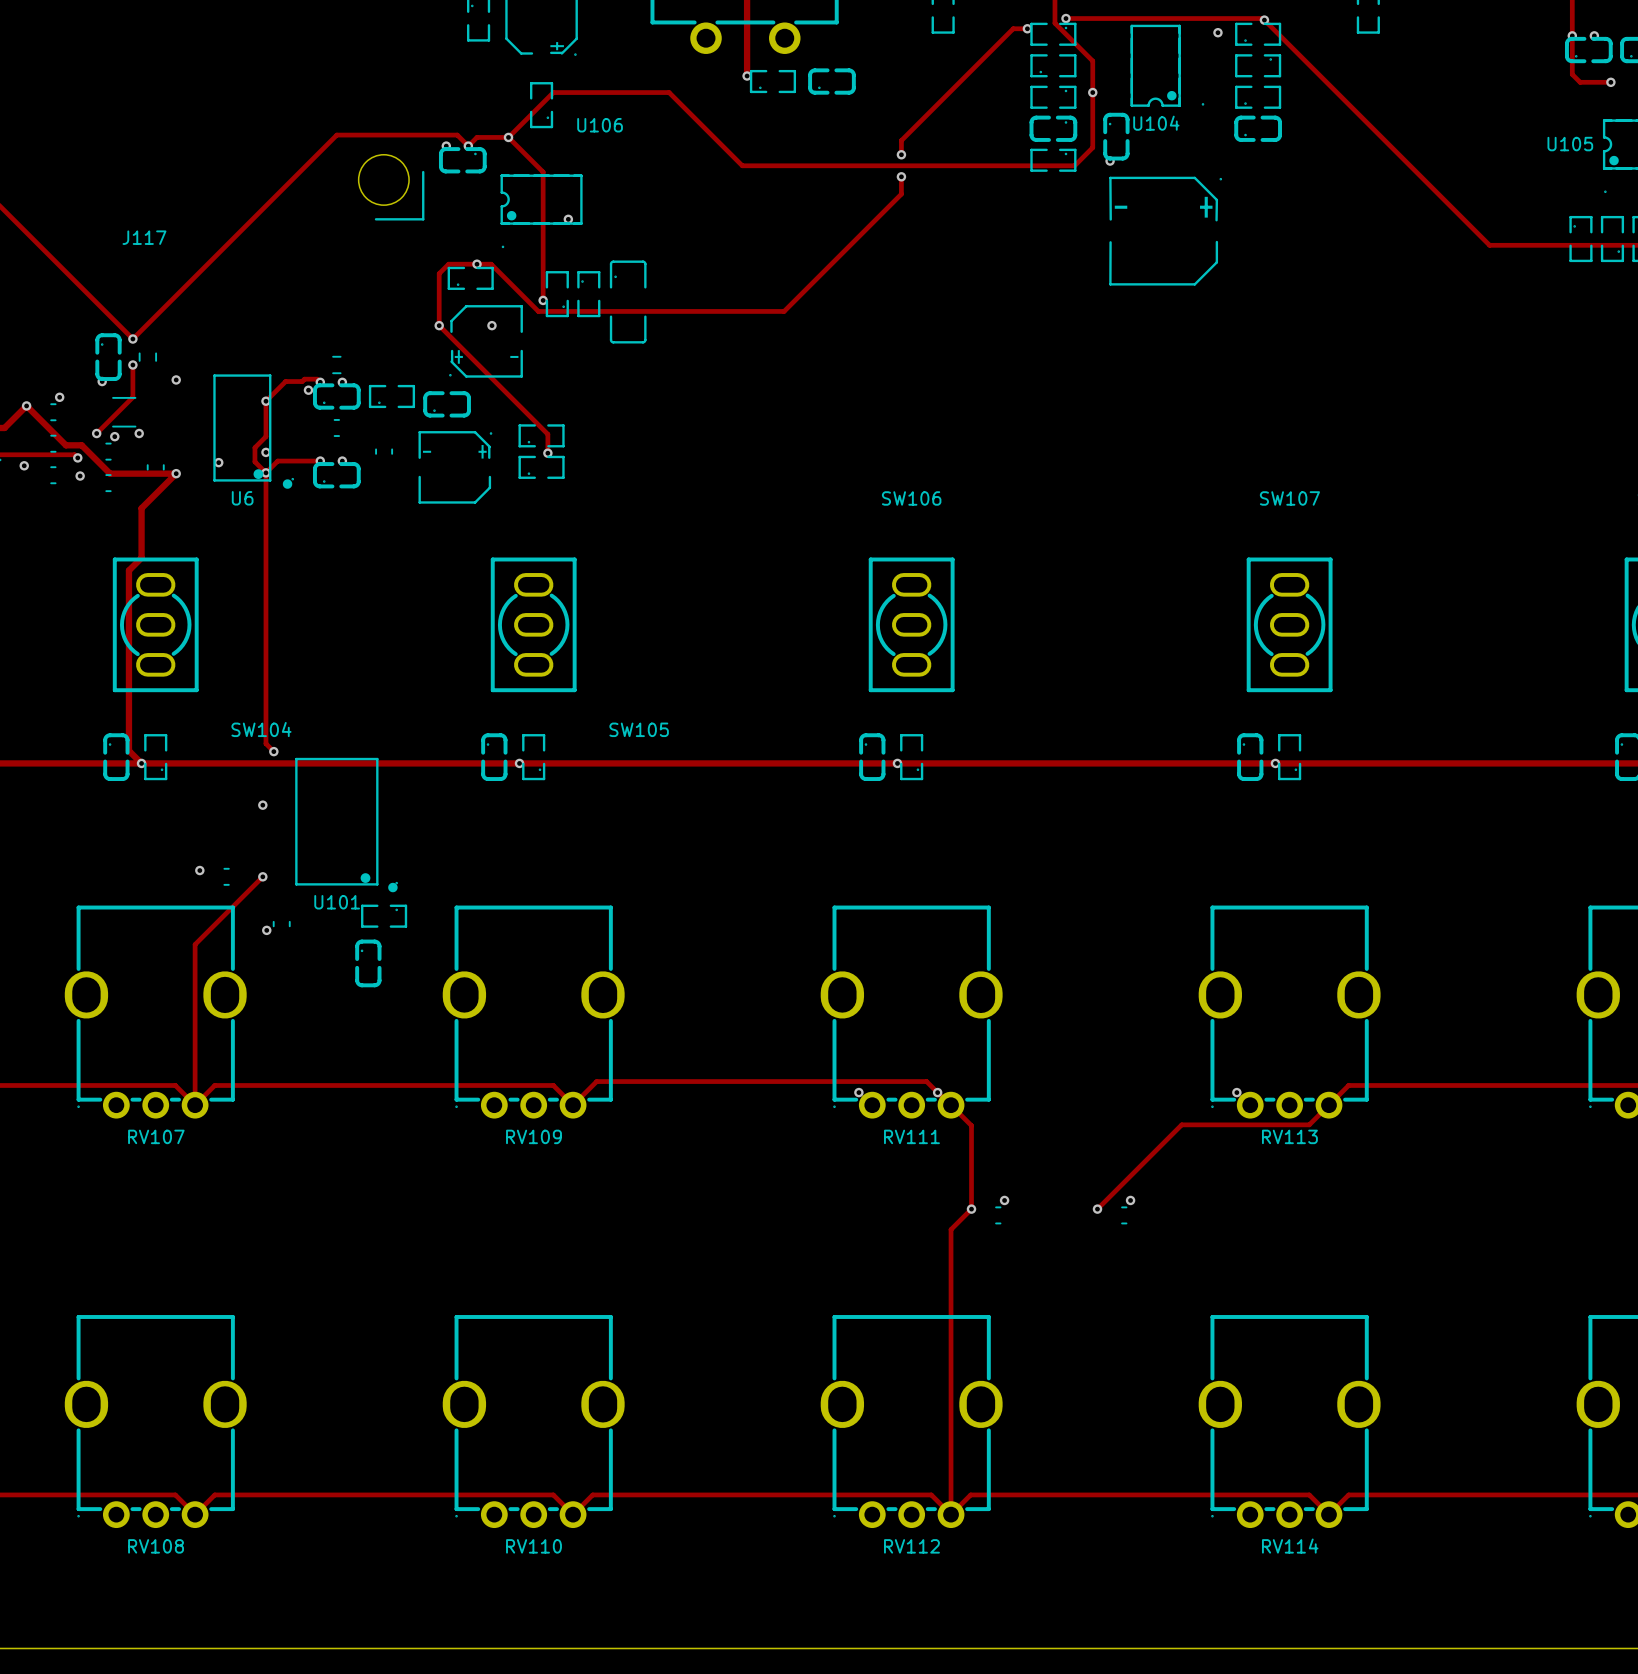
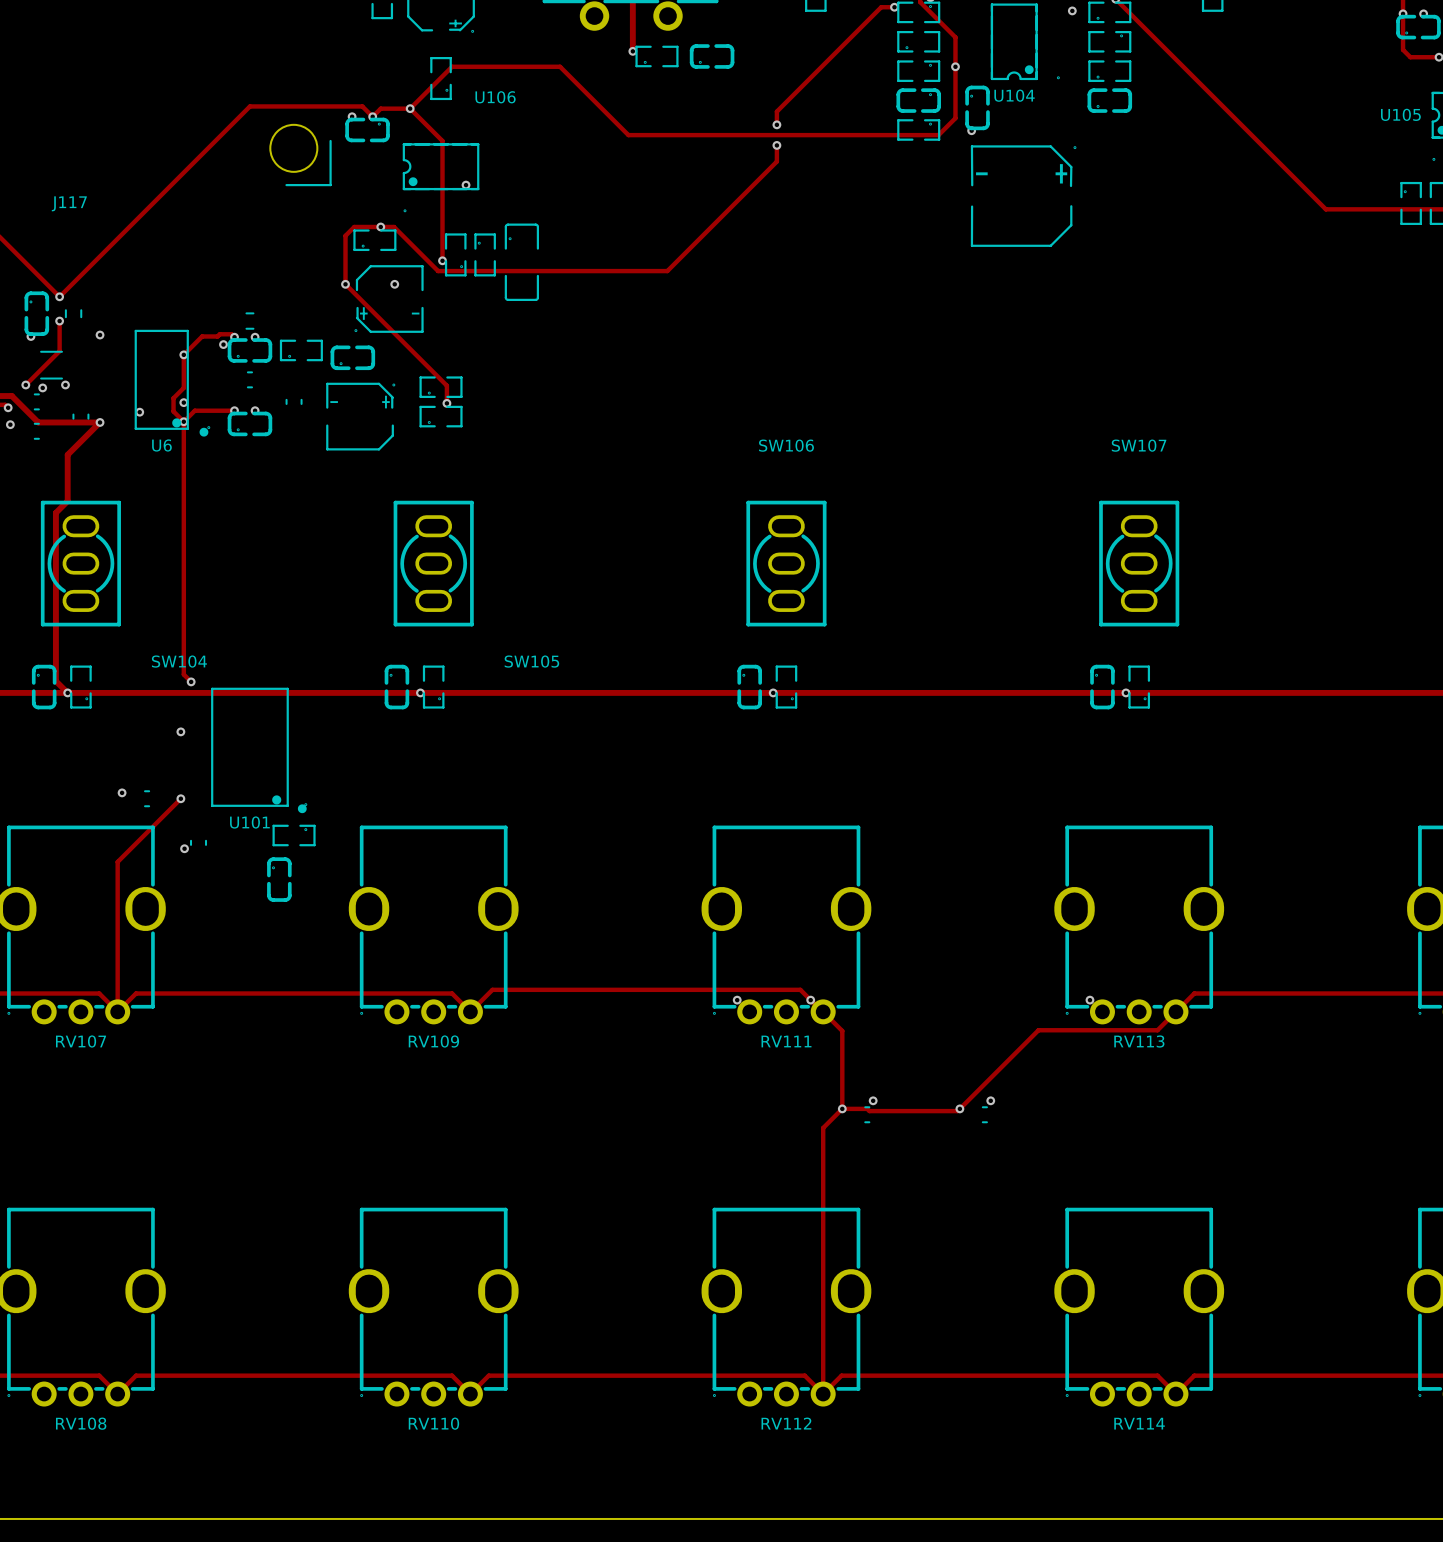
track: none -> (842, 1108) (867, 1108) (869, 1111) (957, 1111) (959, 1108)

